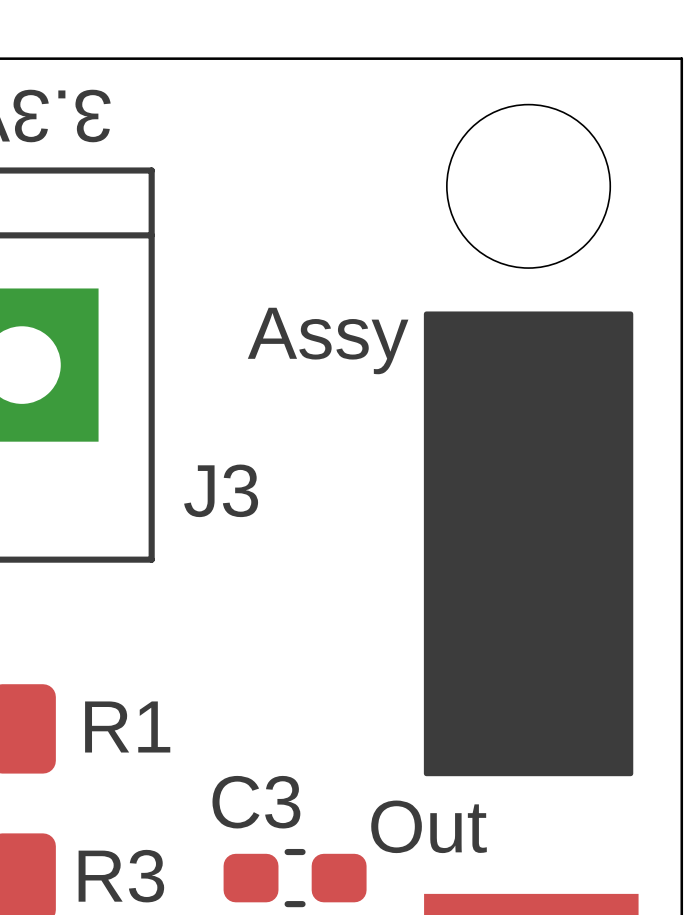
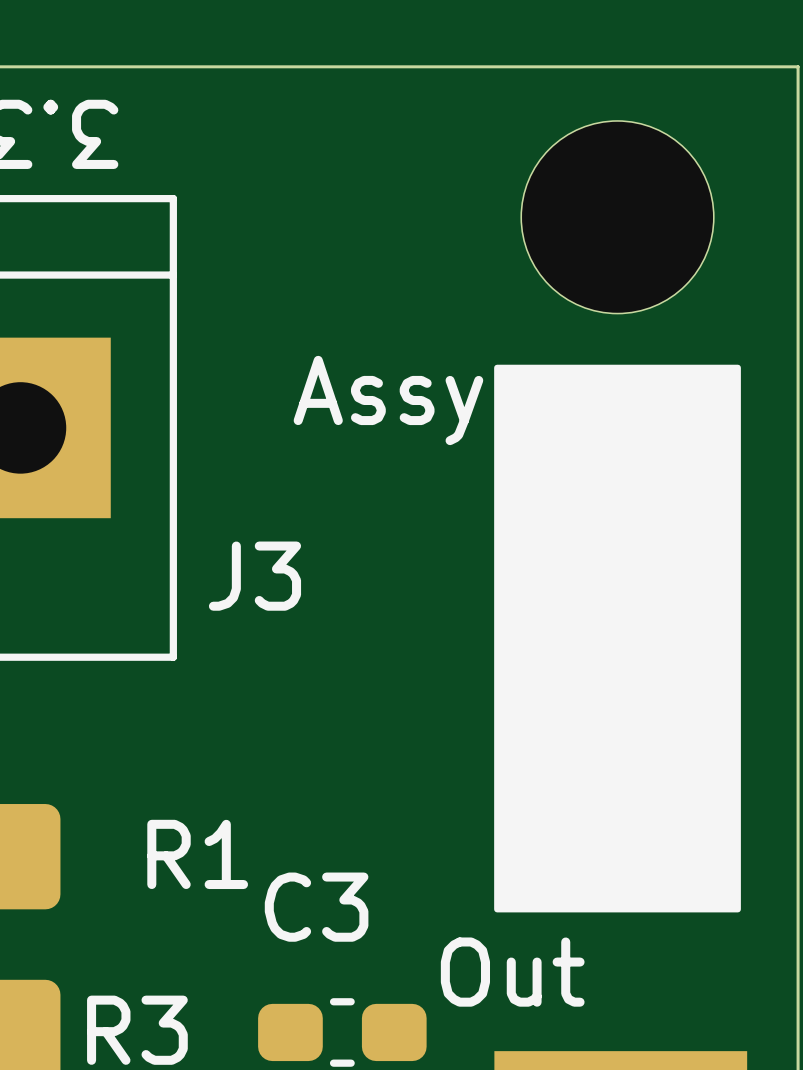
R1 name position: R1 (127, 726) -> R1 (197, 854)
C3 name position: C3 (256, 802) -> C3 (316, 907)

